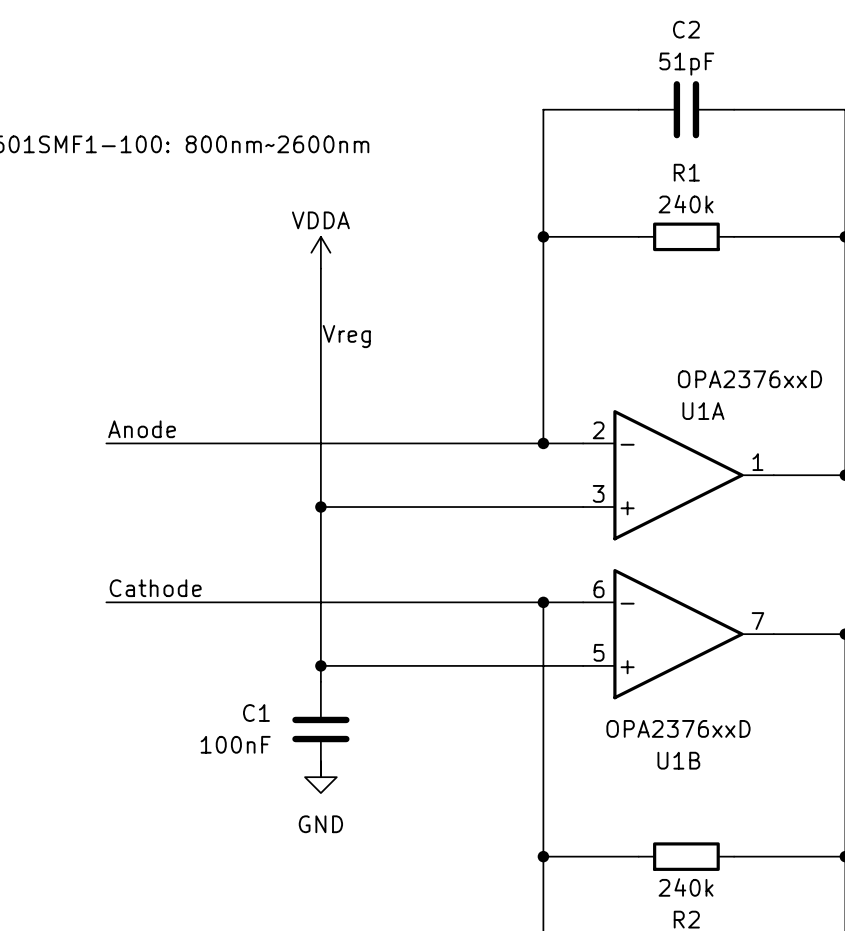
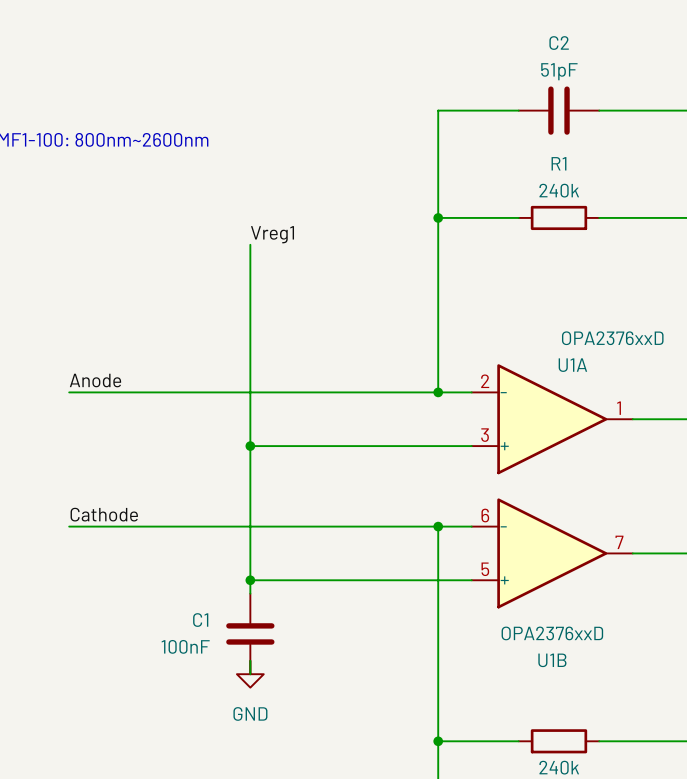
power symbol: VDDA (320, 252) -> none
label: none -> Vreg1 (272, 234)
label: Vreg (346, 336) -> none

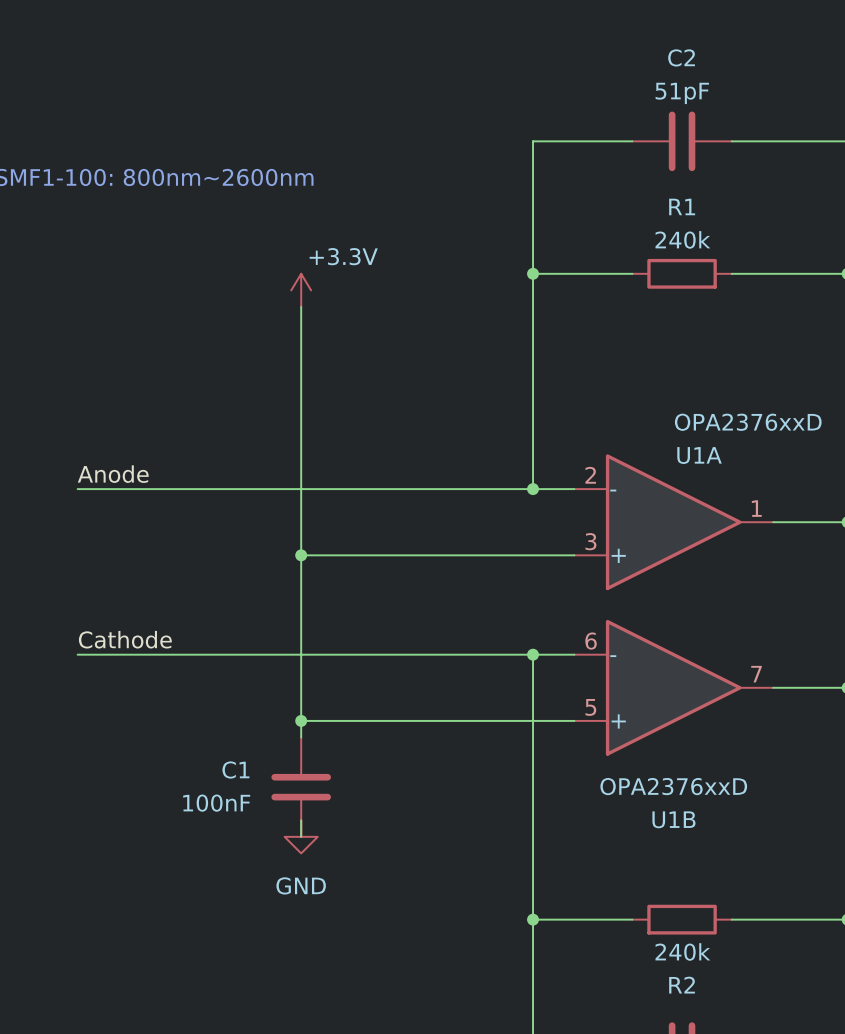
power symbol: none -> +3.3V (301, 290)
label: Vreg1 (272, 234) -> none

